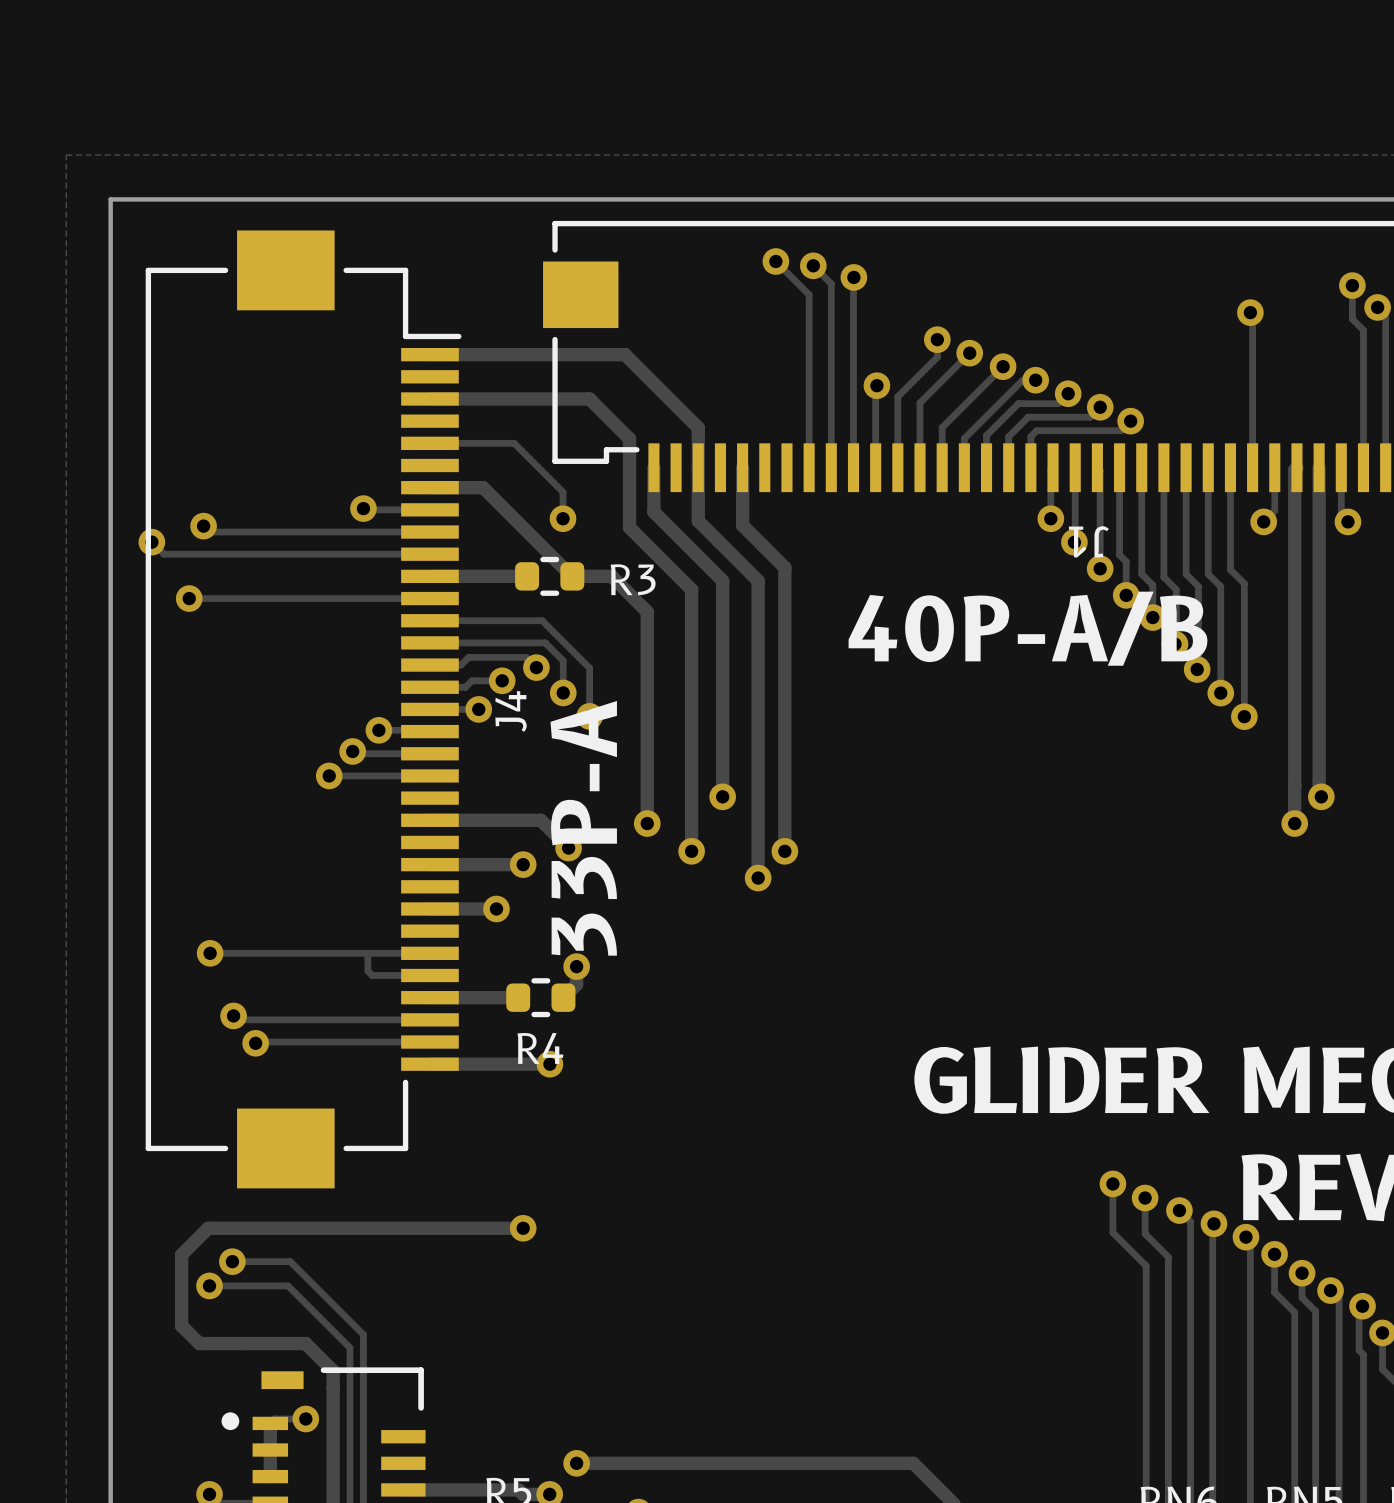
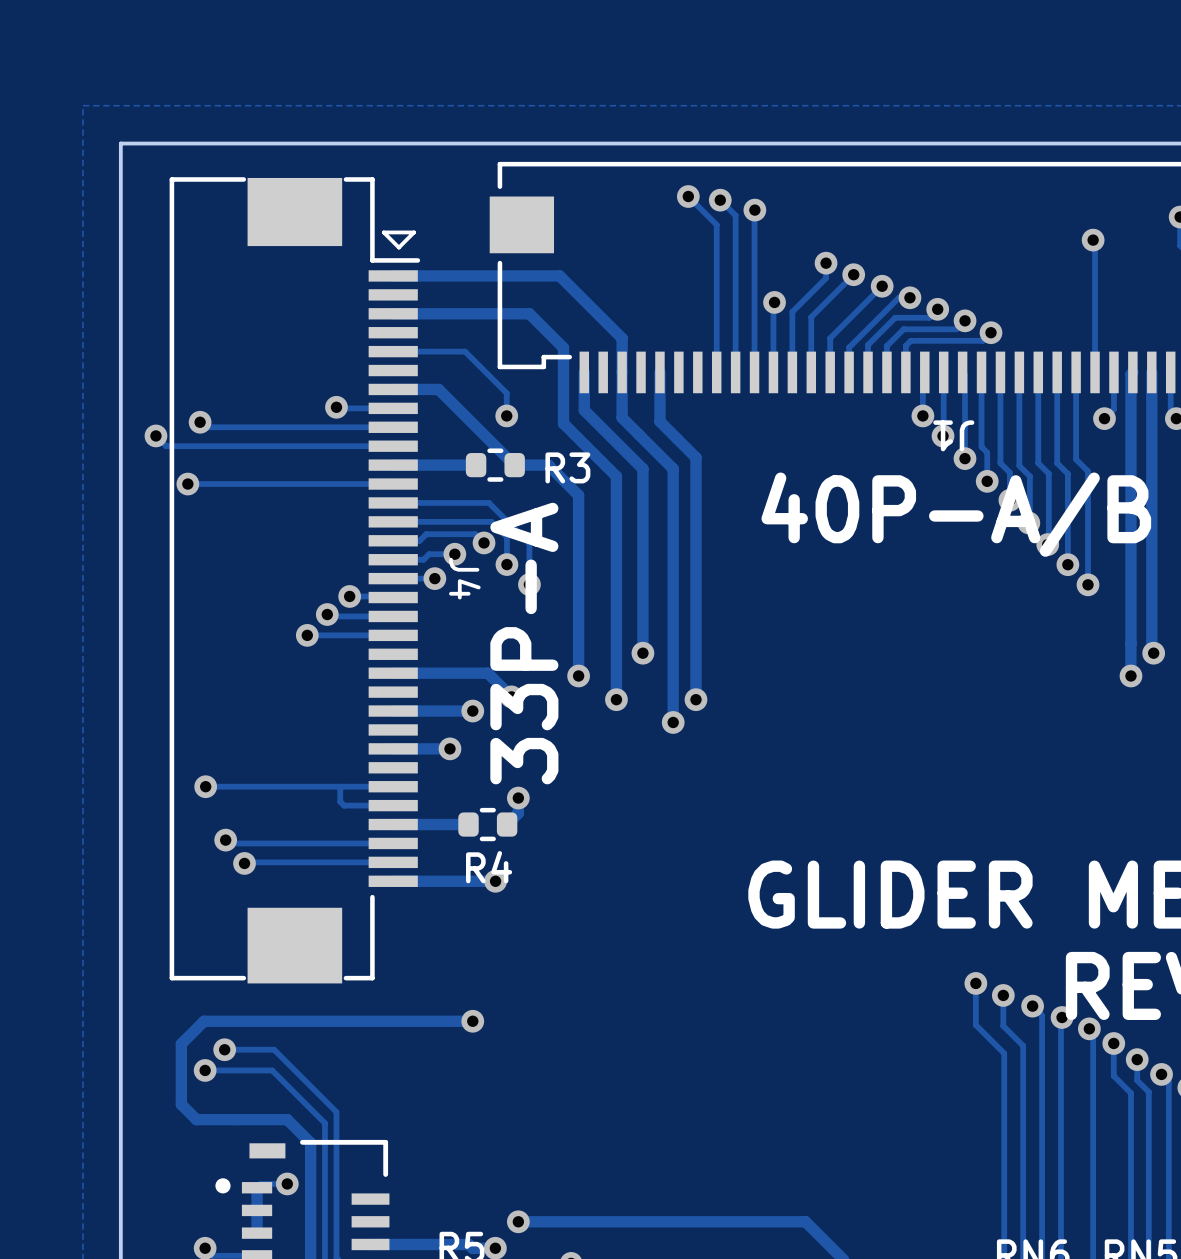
J4 footprint: [145, 230, 462, 1189] -> [169, 177, 421, 984]
J4 name rotation: 0° (511, 711) -> 180° (464, 578)

